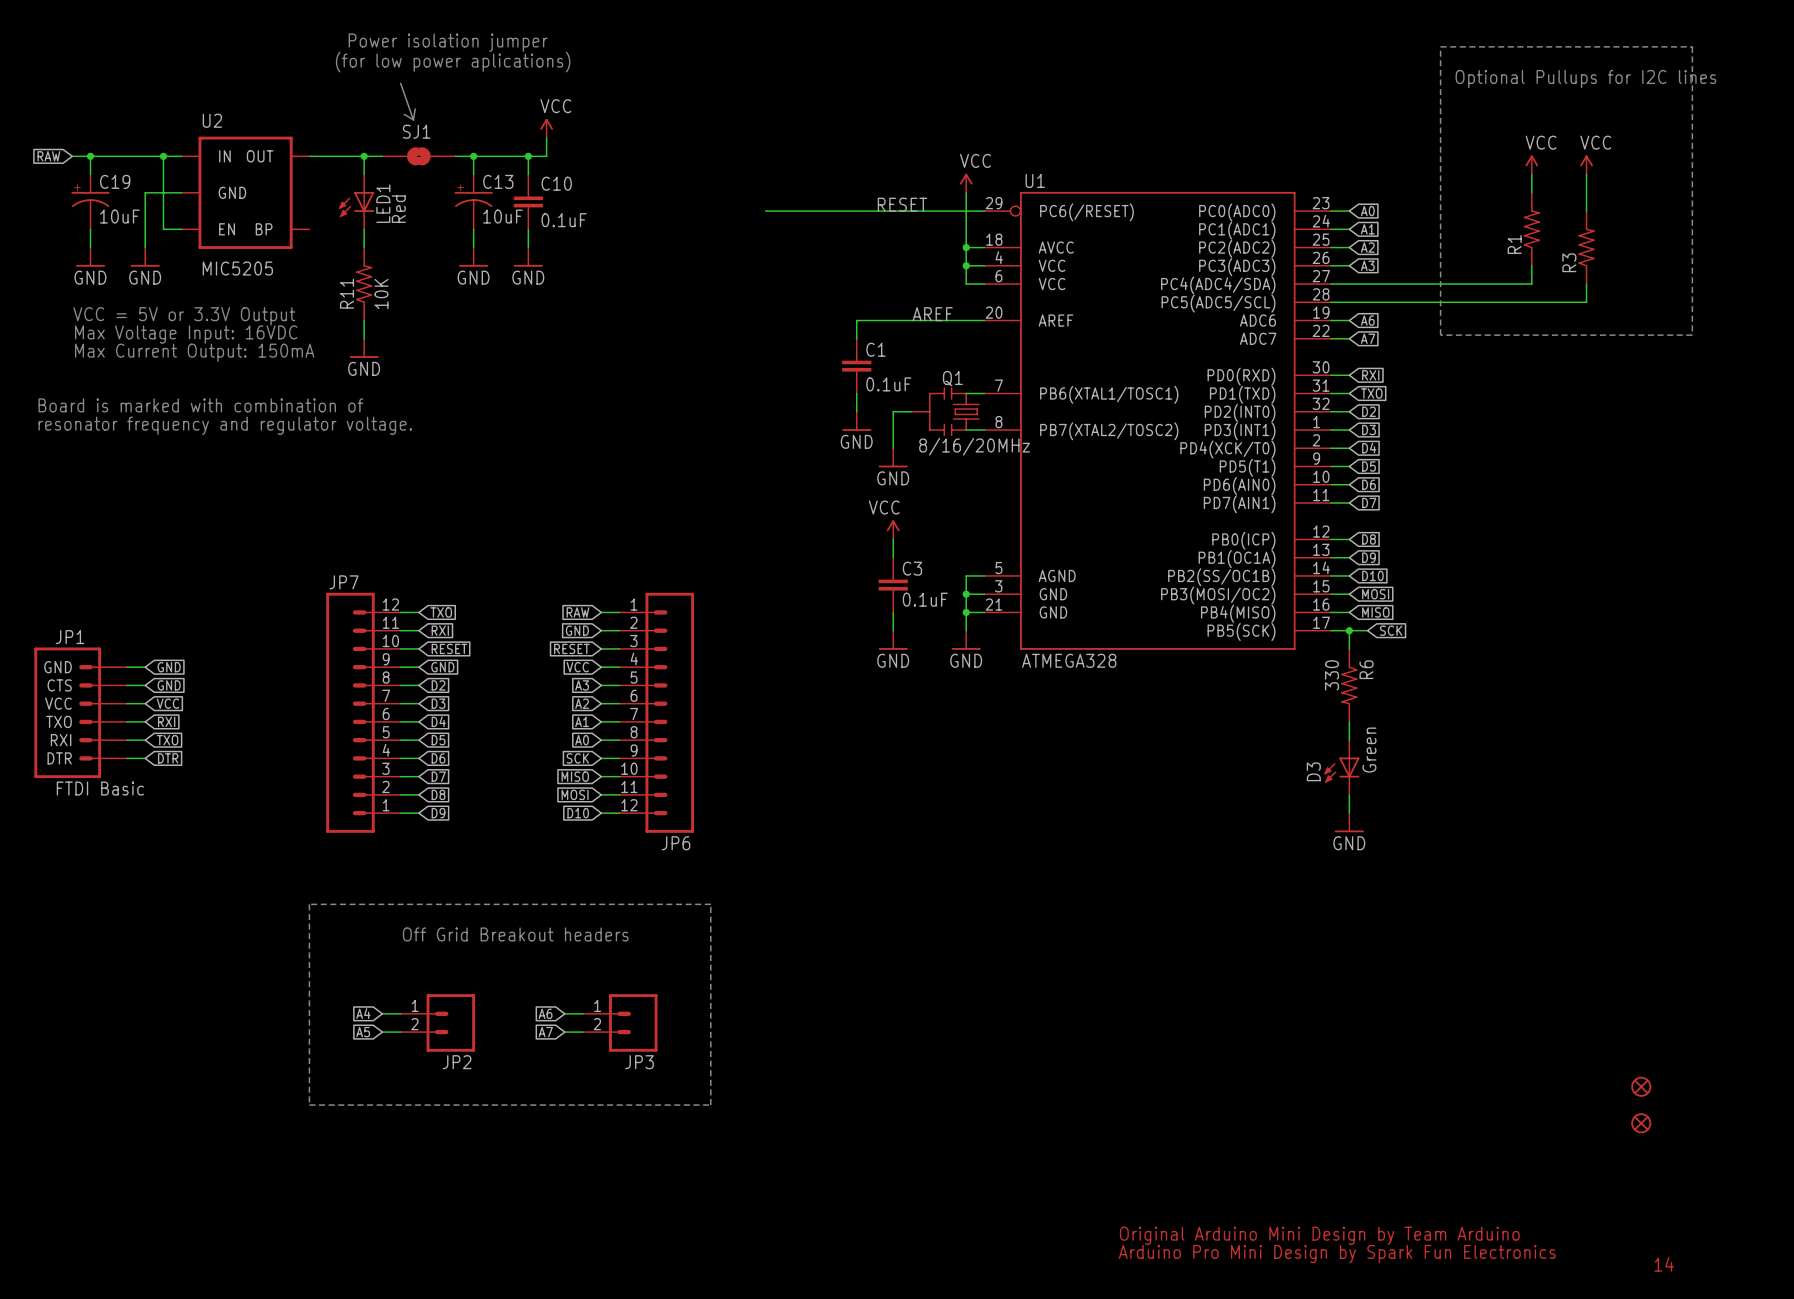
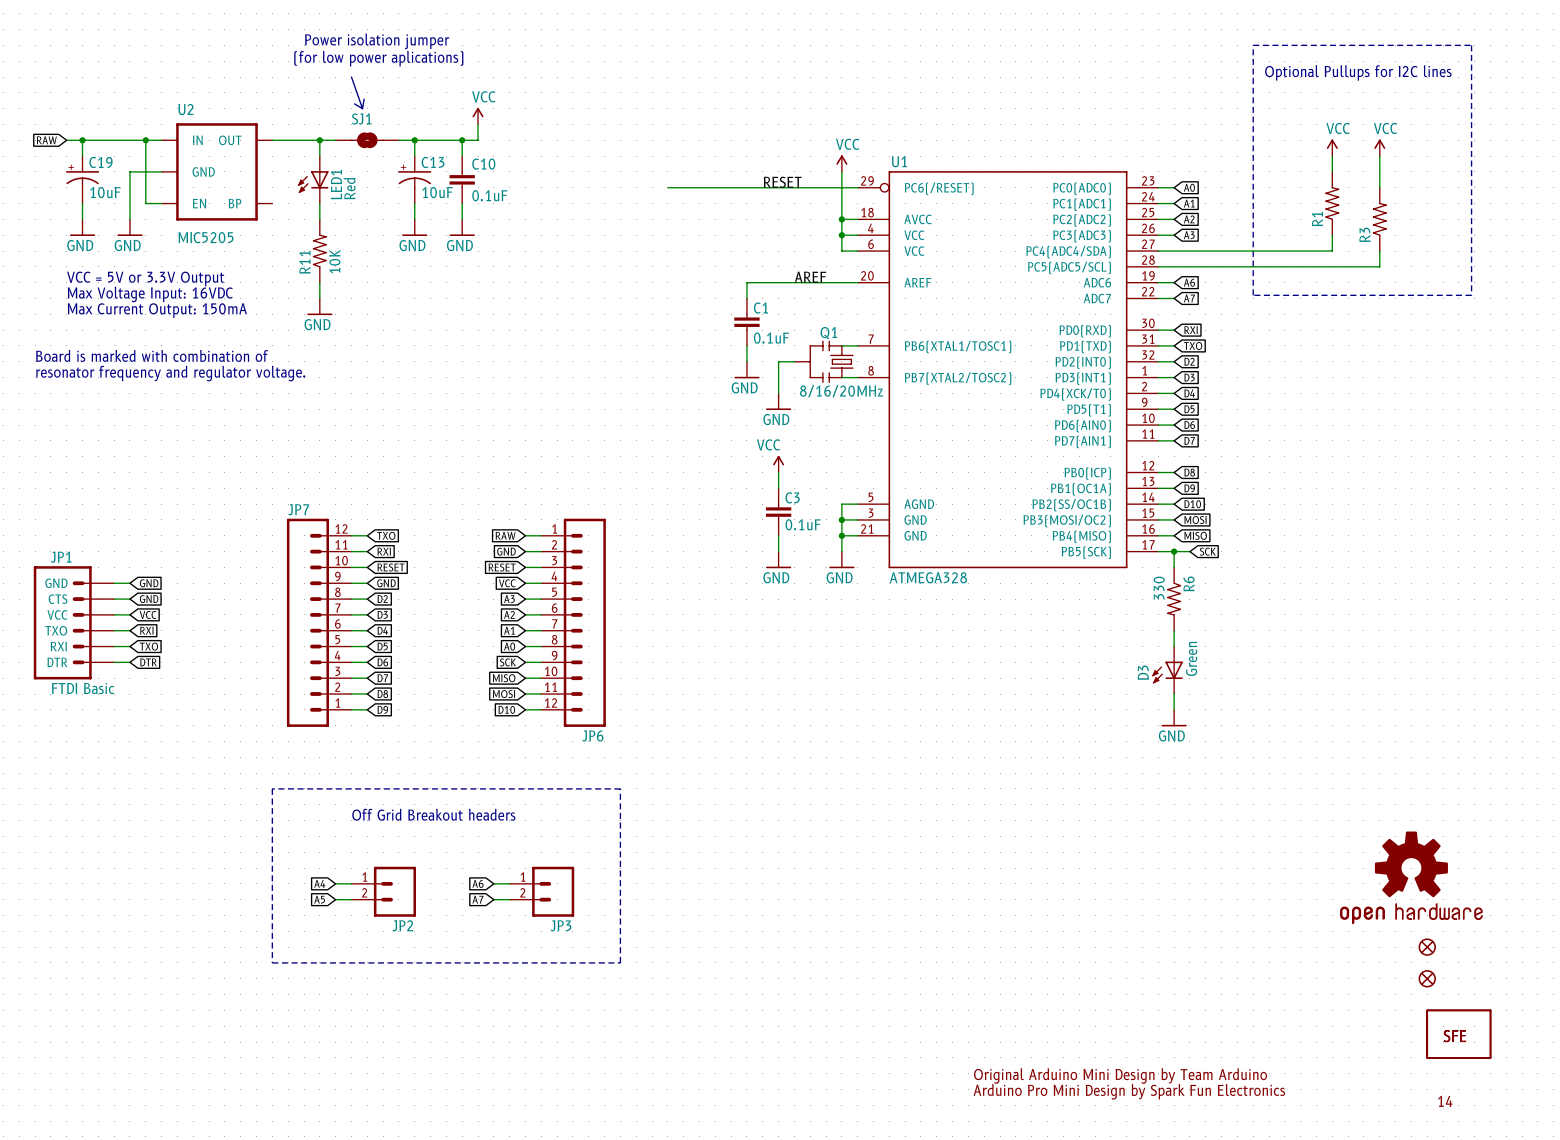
part: none -> (1411, 877)
part: none -> (1458, 1034)

